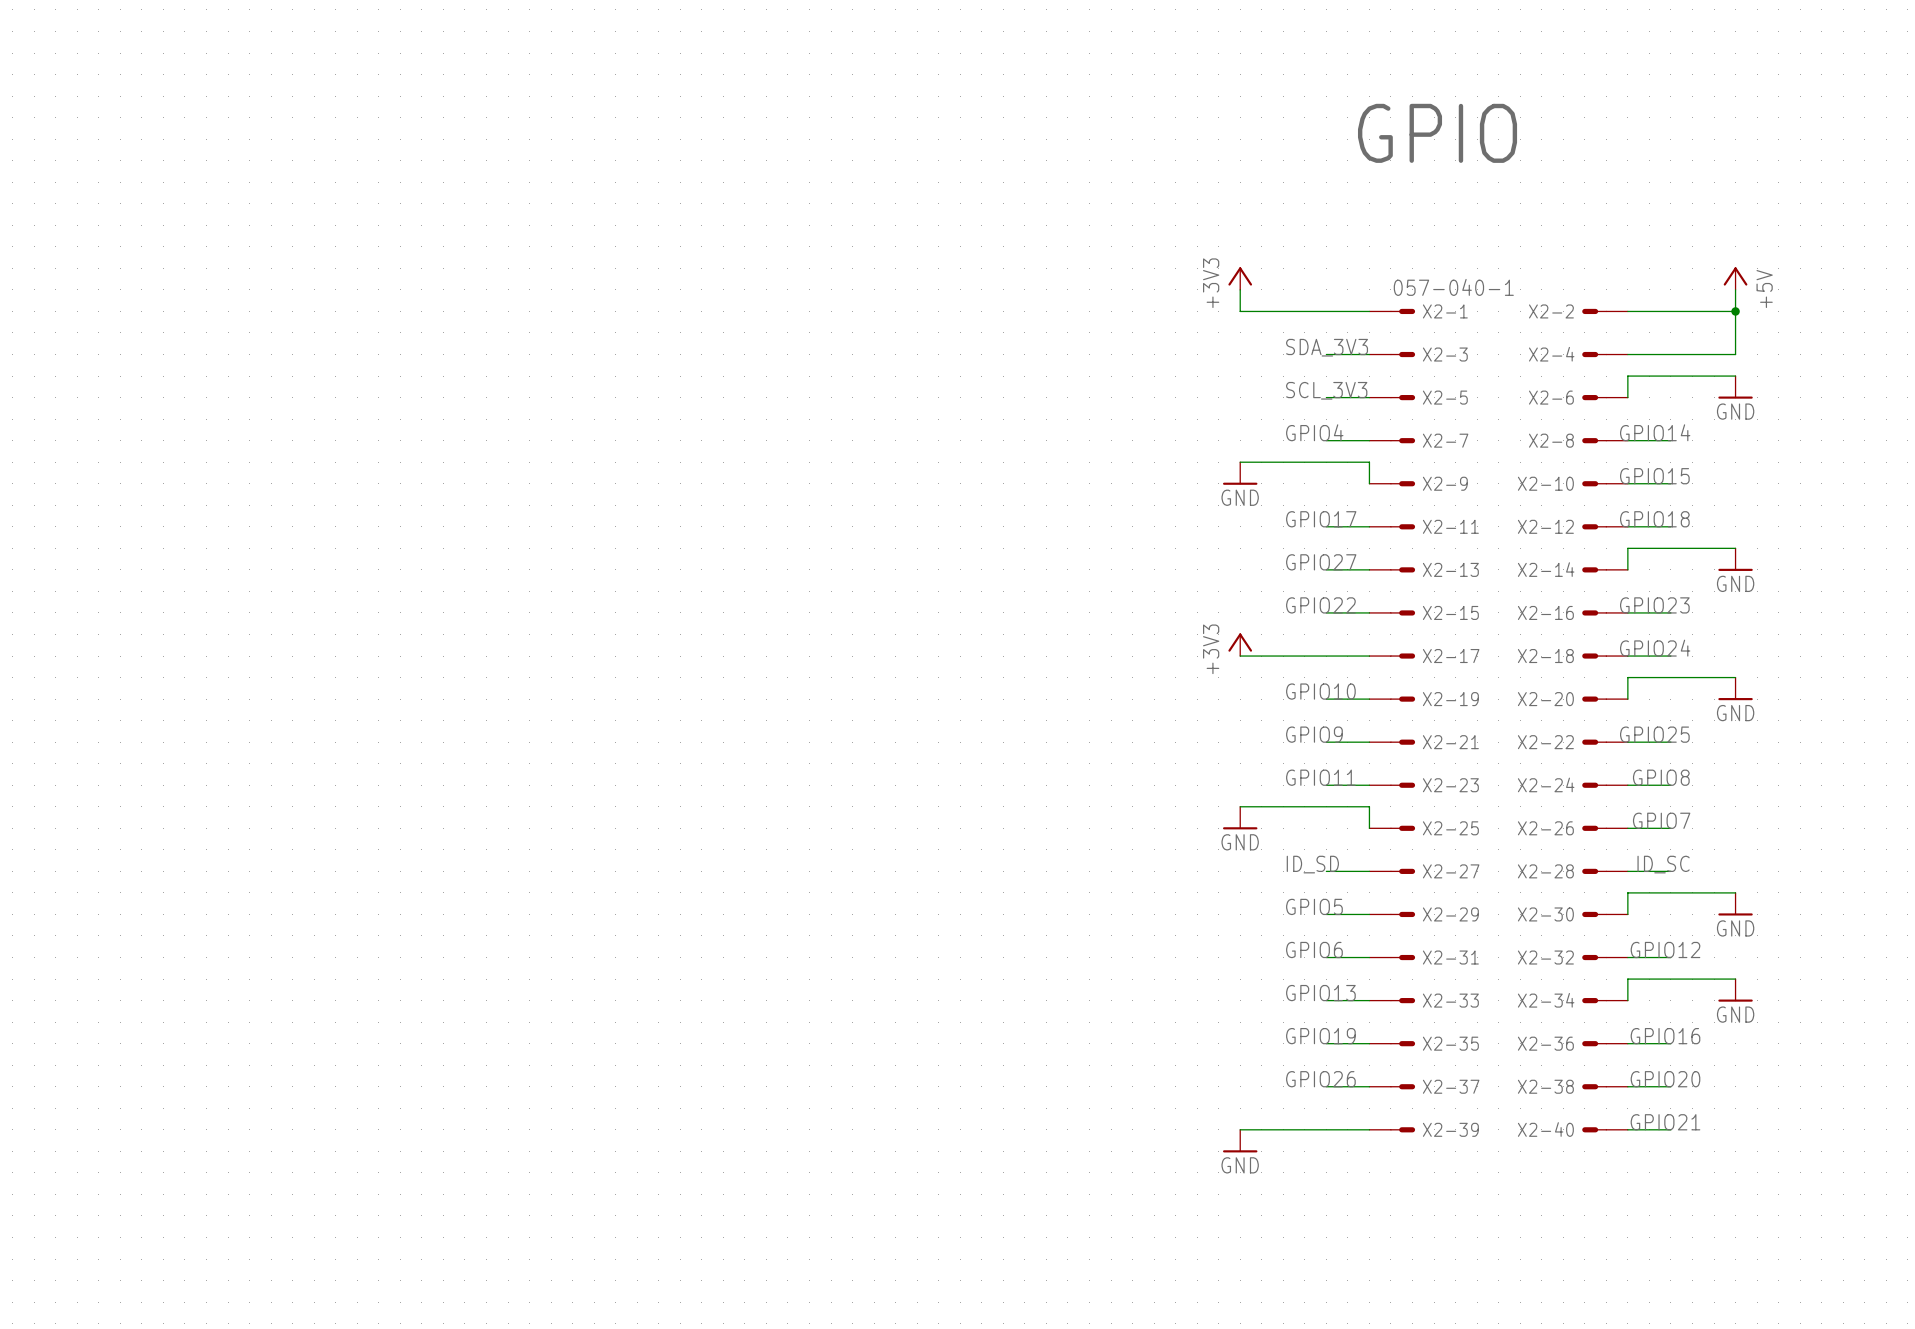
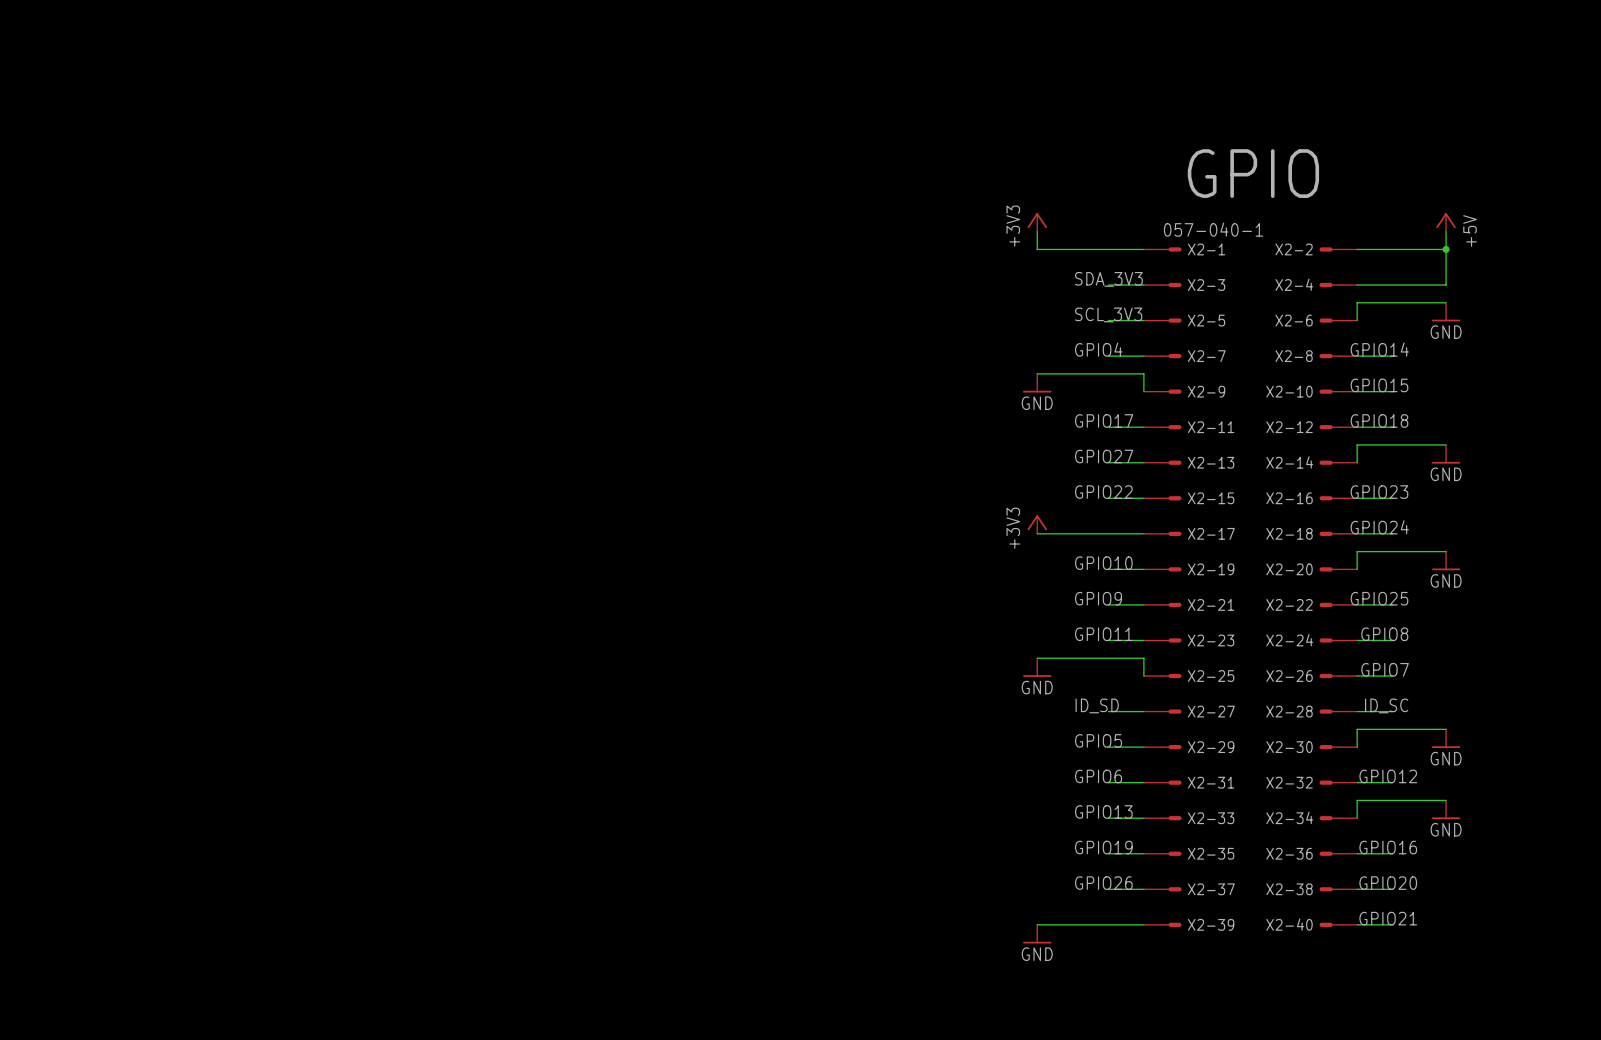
text position: GPIO (1437, 133) -> GPIO (1253, 173)

